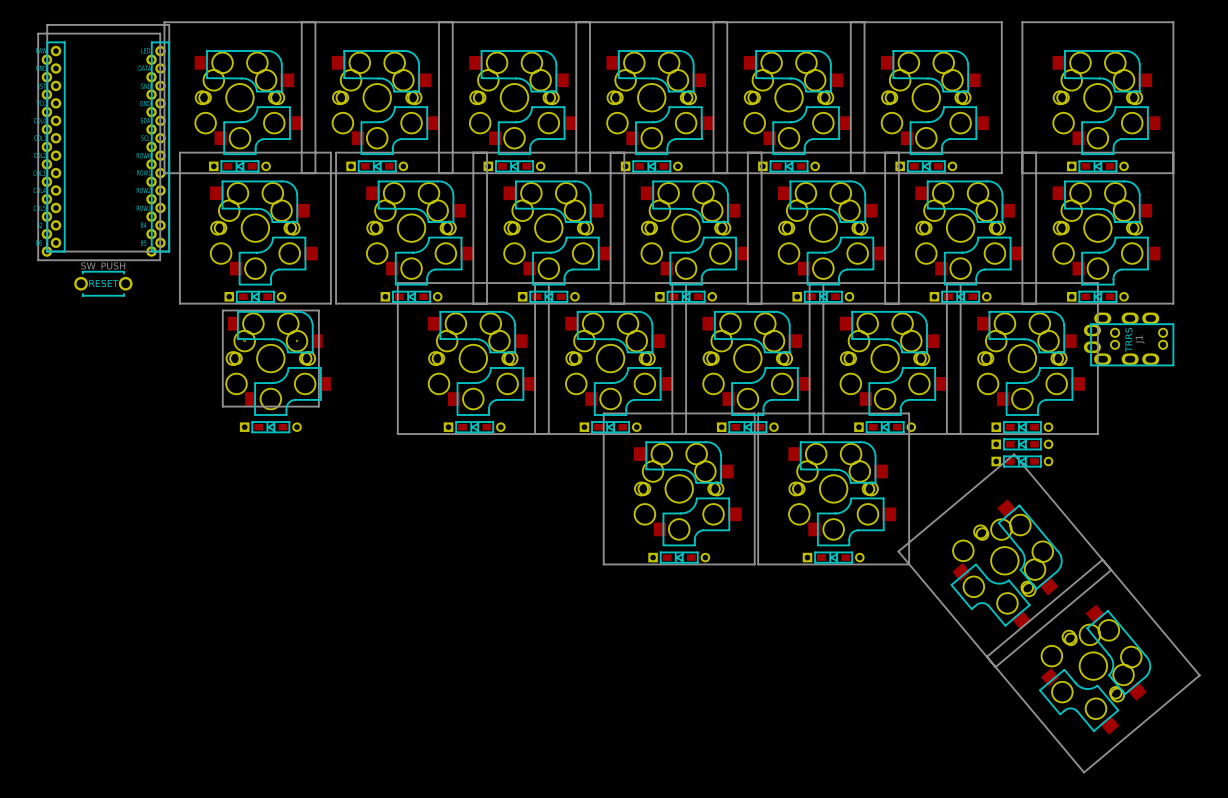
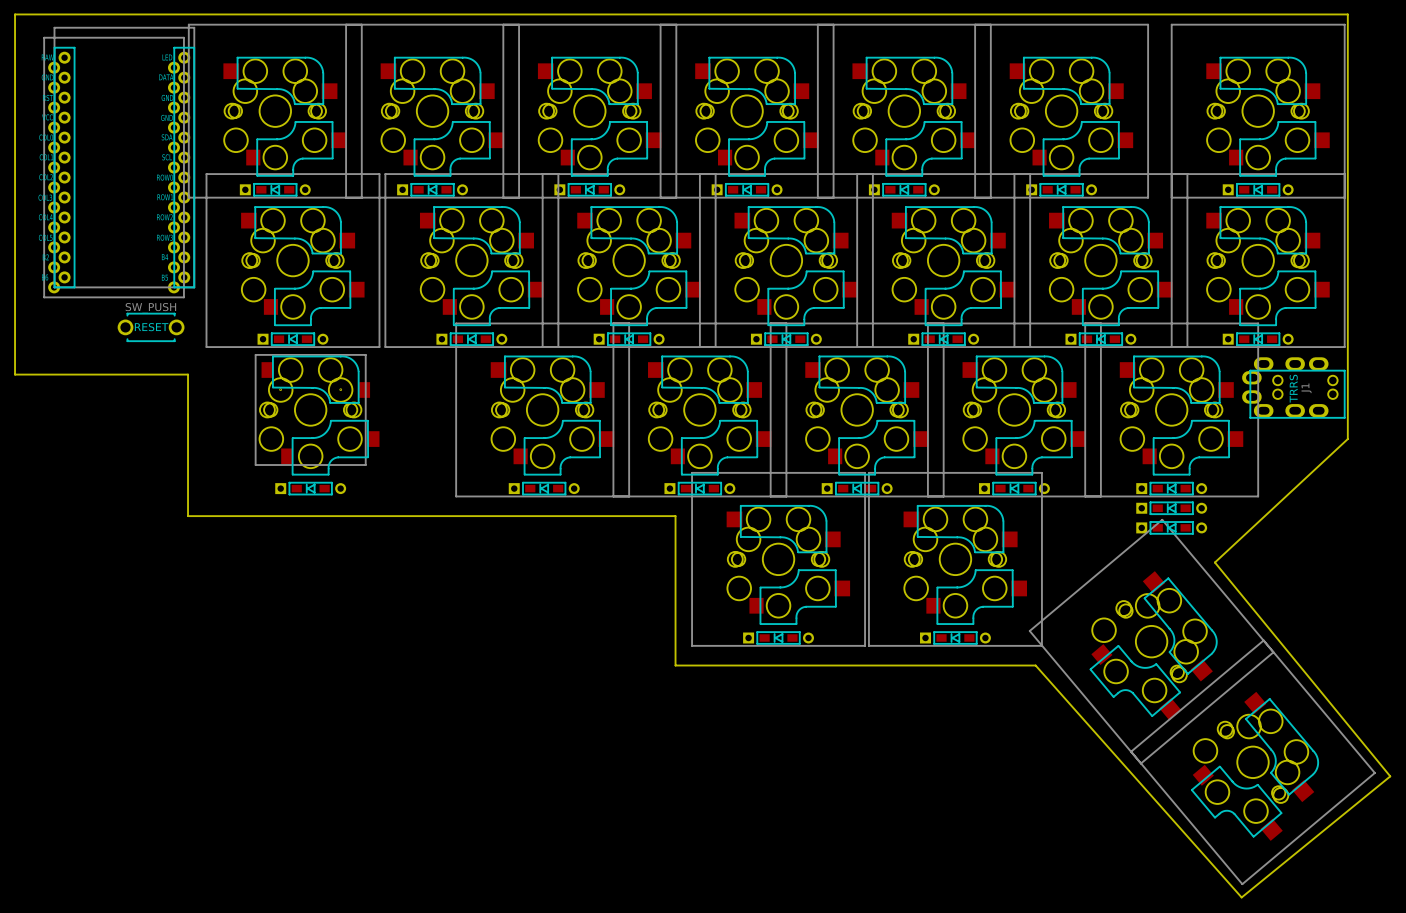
board edge: none -> (15, 14) (15, 374) (188, 374) (188, 516) (675, 516) (675, 665) (1035, 665) (1241, 897) (1390, 776) (1214, 562) (1347, 439) (1347, 14) (15, 14)
part position: (103, 283) -> (151, 327)

